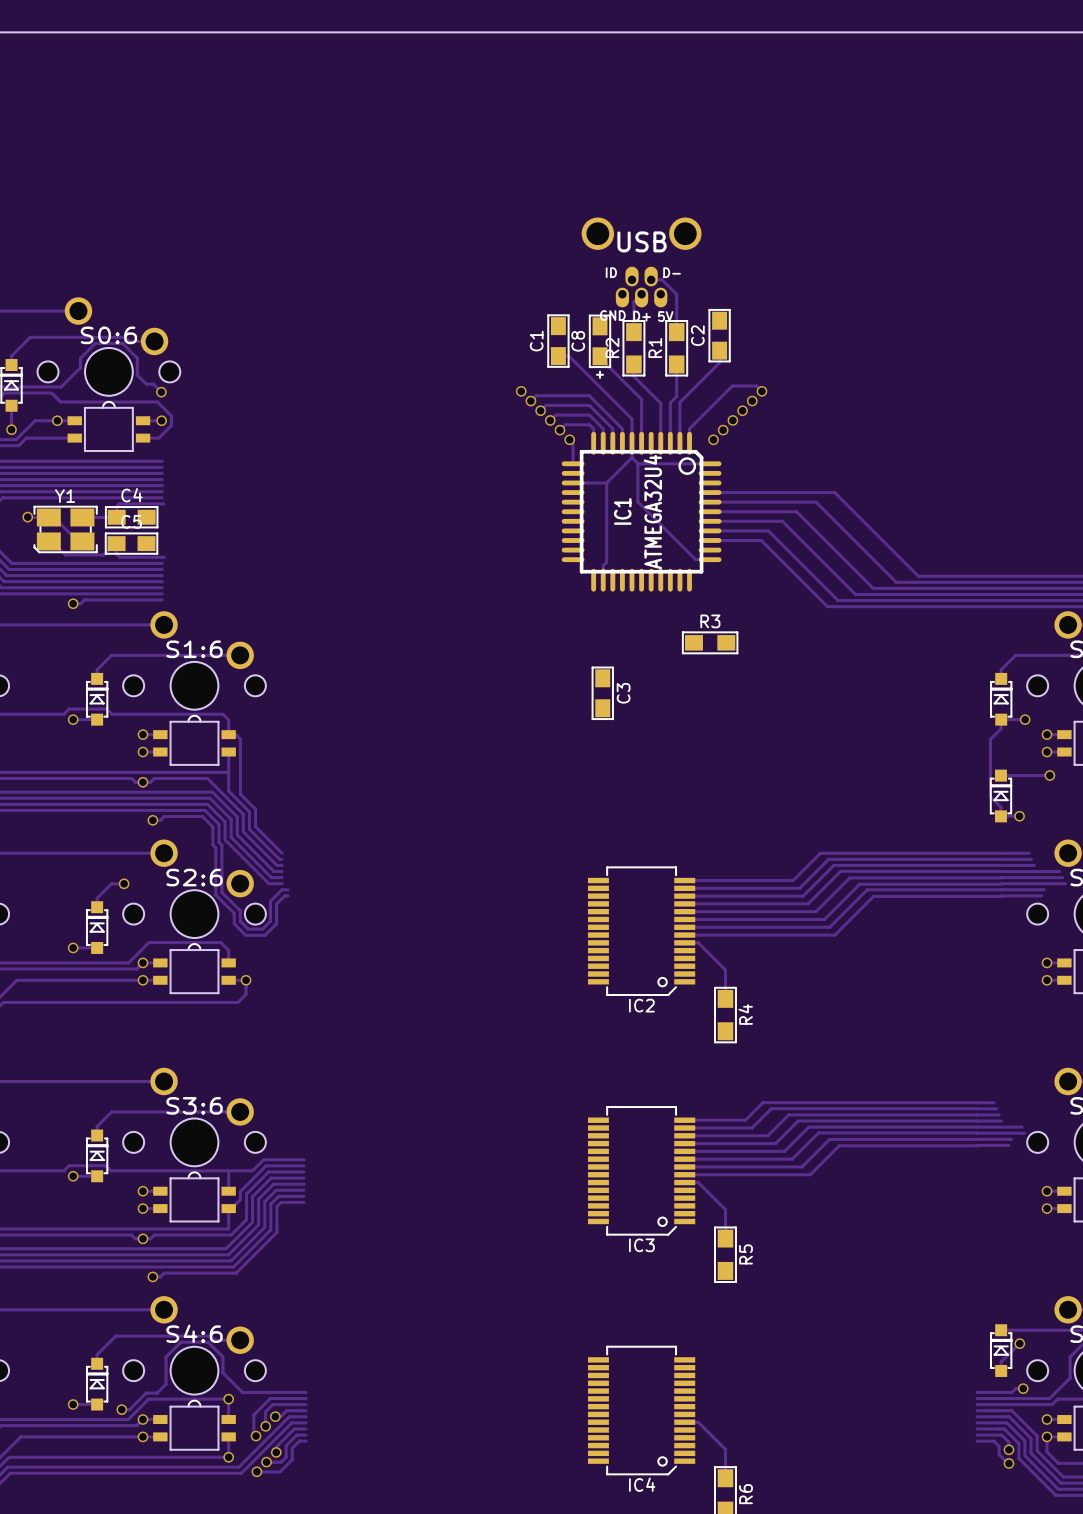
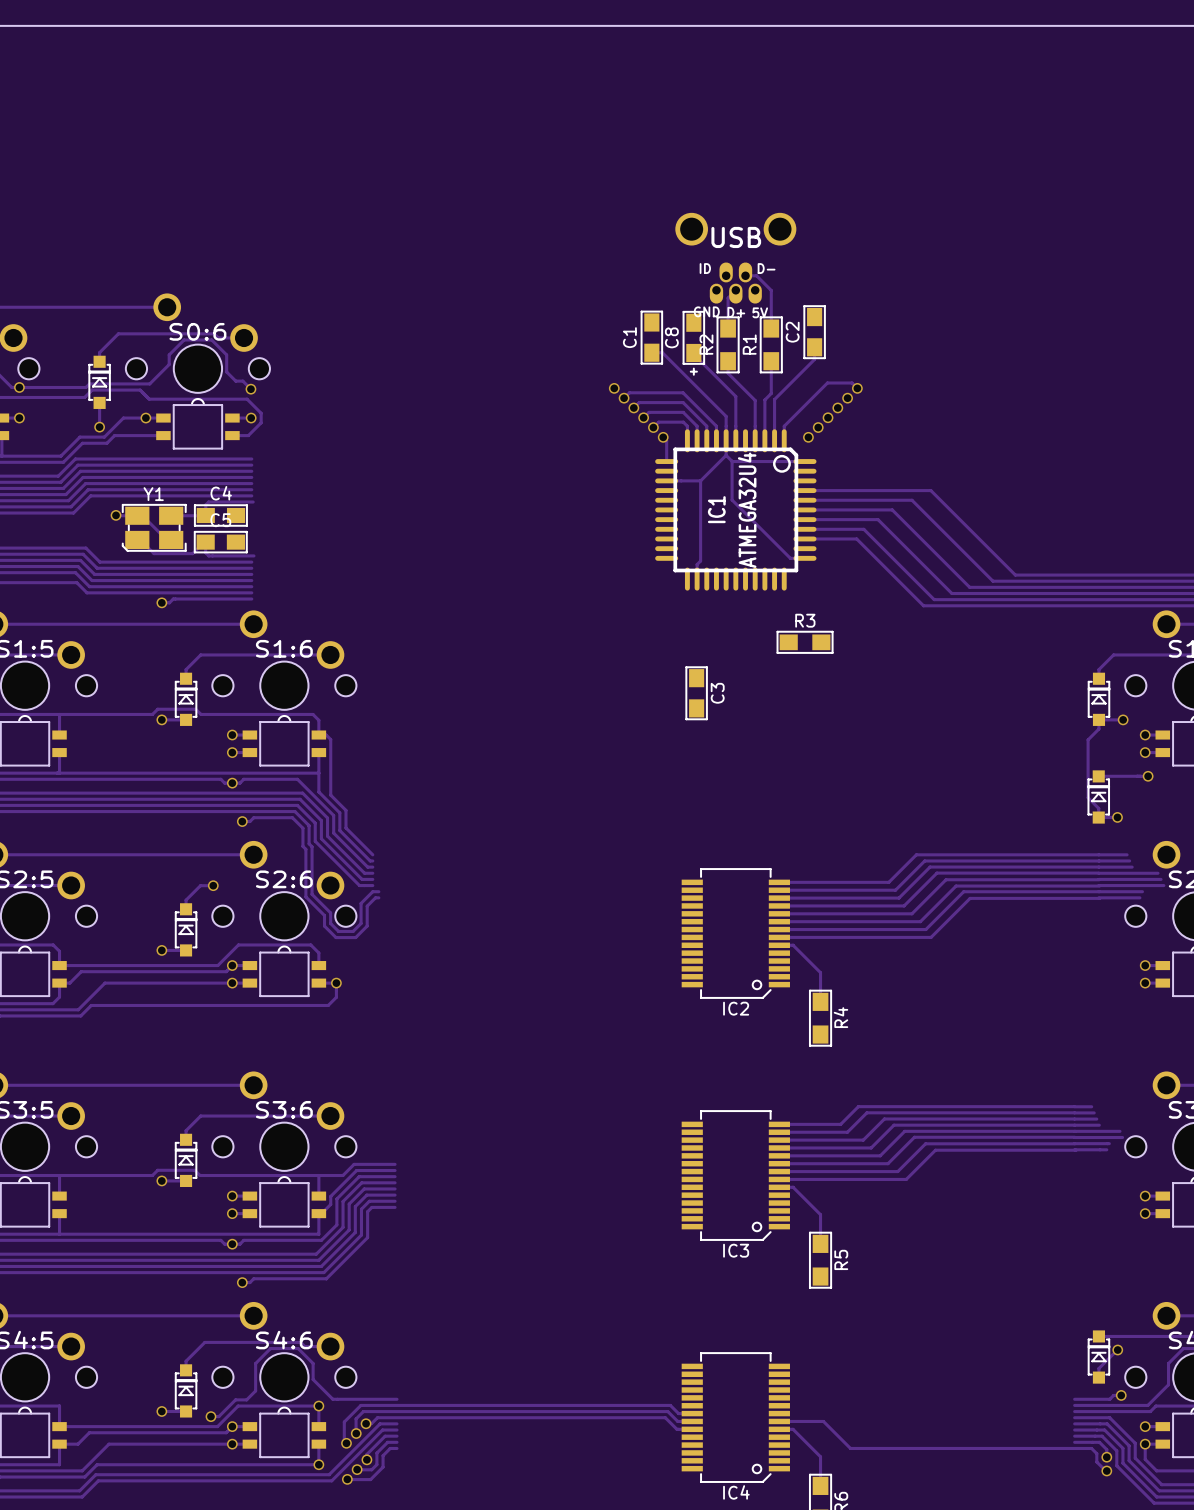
track: none -> (396, 1405) (670, 1405) (678, 1413) (692, 1413)
track: none -> (396, 1411) (667, 1411) (677, 1421) (692, 1421)
track: none -> (396, 1417) (665, 1417) (676, 1429) (692, 1429)
track: none -> (779, 1421) (823, 1421) (850, 1448) (1074, 1448)

